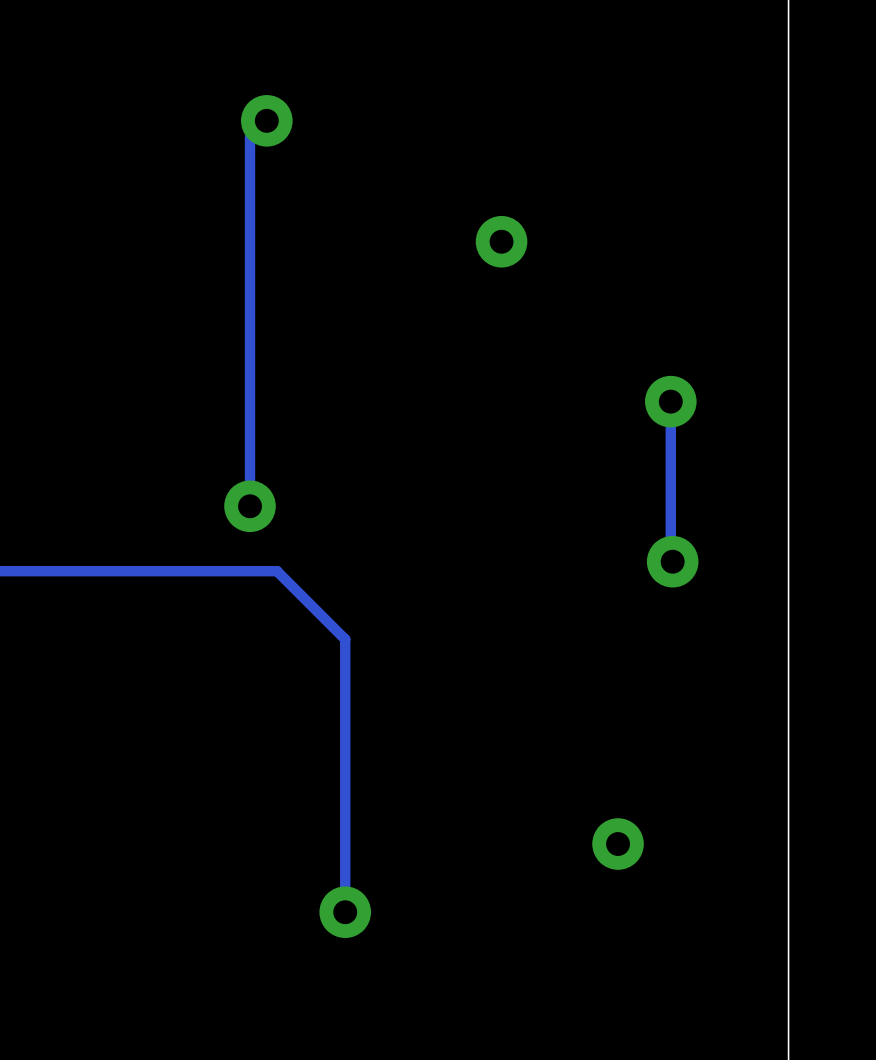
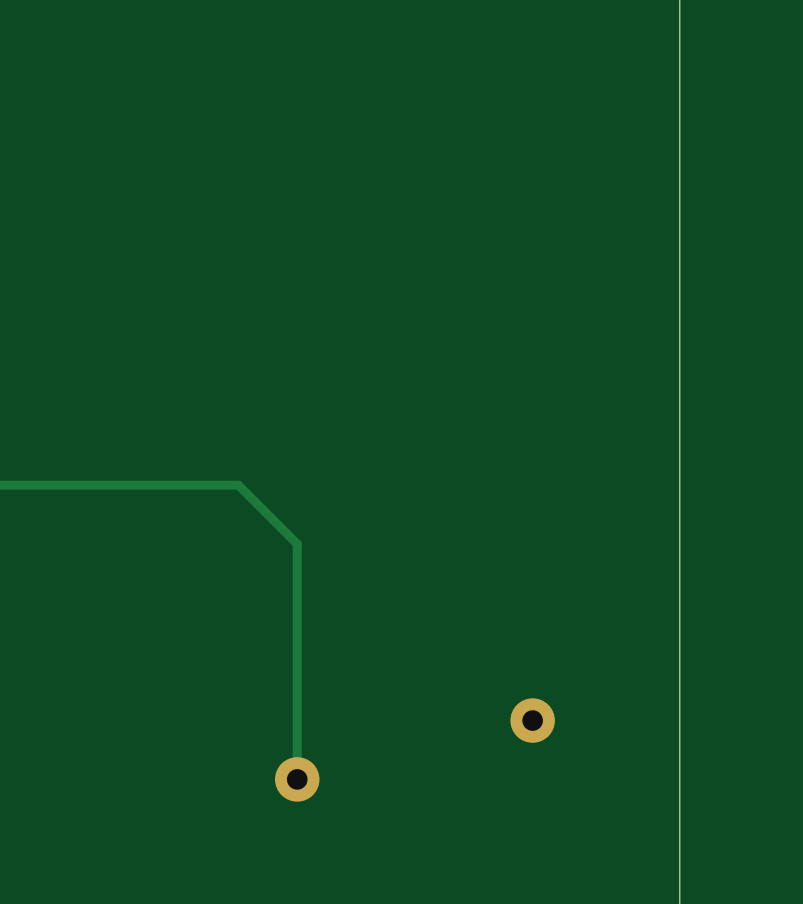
track: (266, 120) (250, 137) (250, 506) -> none
via: (266, 120) -> none
via: (501, 241) -> none
track: (670, 401) (670, 559) (672, 561) -> none
via: (670, 401) -> none
via: (250, 506) -> none
via: (672, 561) -> none

